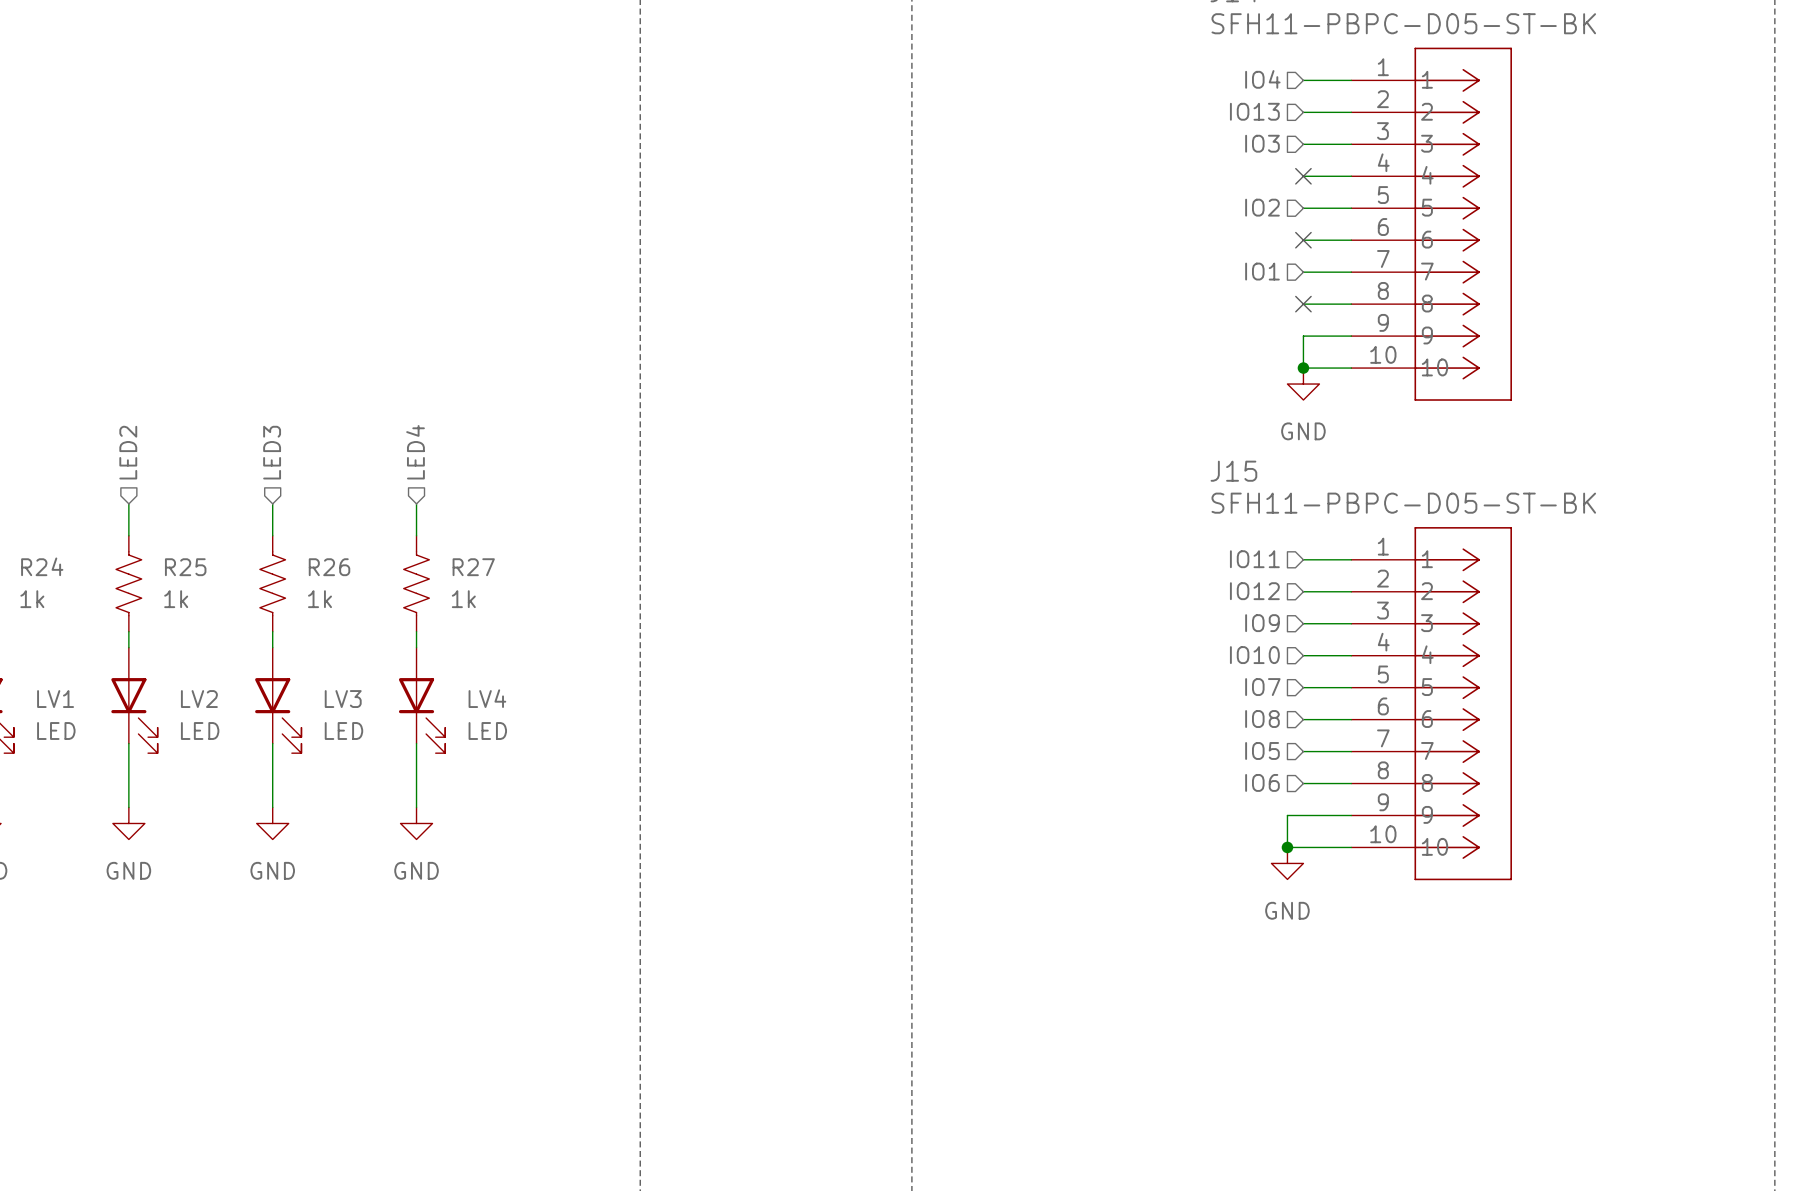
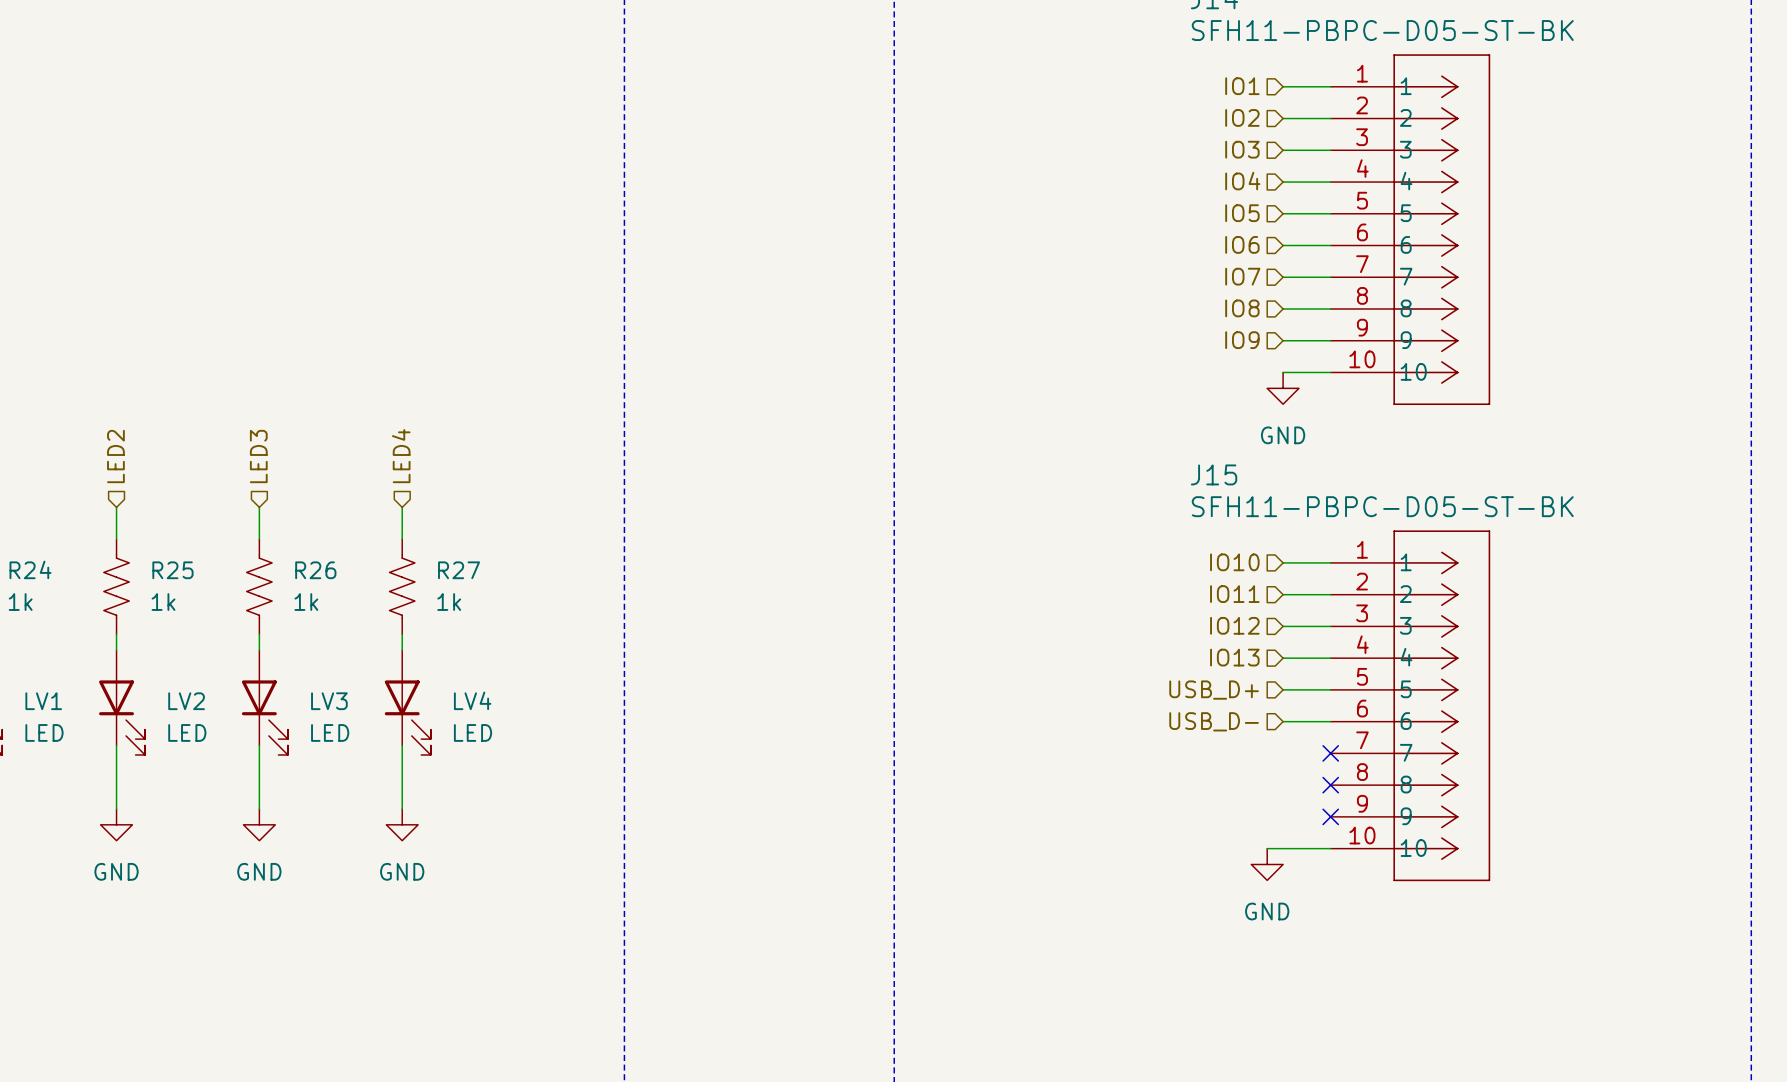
hierarchical label: IO4 (1262, 79) -> IO1 (1242, 86)
hierarchical label: IO13 (1254, 111) -> IO2 (1242, 117)
hierarchical label: none -> IO4 (1242, 181)
no-connect mark: (1303, 176) -> none
hierarchical label: IO2 (1262, 207) -> IO5 (1242, 213)
hierarchical label: none -> IO6 (1242, 244)
no-connect mark: (1303, 240) -> none
hierarchical label: IO1 (1262, 271) -> IO7 (1242, 276)
hierarchical label: none -> IO8 (1242, 308)
no-connect mark: (1303, 304) -> none
hierarchical label: none -> IO9 (1242, 340)
wire: (1303, 336) (1303, 368) -> none
junction: (1303, 368) -> none
hierarchical label: IO11 (1254, 559) -> IO10 (1234, 562)
hierarchical label: IO12 (1254, 591) -> IO11 (1234, 594)
hierarchical label: IO9 (1262, 623) -> IO12 (1234, 625)
hierarchical label: IO10 (1254, 655) -> IO13 (1234, 657)
hierarchical label: IO7 (1262, 687) -> USB_D+ (1214, 690)
hierarchical label: IO8 (1262, 719) -> USB_D- (1214, 721)
hierarchical label: IO5 (1262, 750) -> none
wire: (1303, 751) (1351, 751) -> none
no-connect mark: none -> (1330, 753)
hierarchical label: IO6 (1262, 782) -> none
wire: (1303, 783) (1351, 783) -> none
no-connect mark: none -> (1330, 785)
wire: (1351, 815) (1287, 815) (1287, 847) -> none
no-connect mark: none -> (1330, 816)
junction: (1287, 847) -> none

